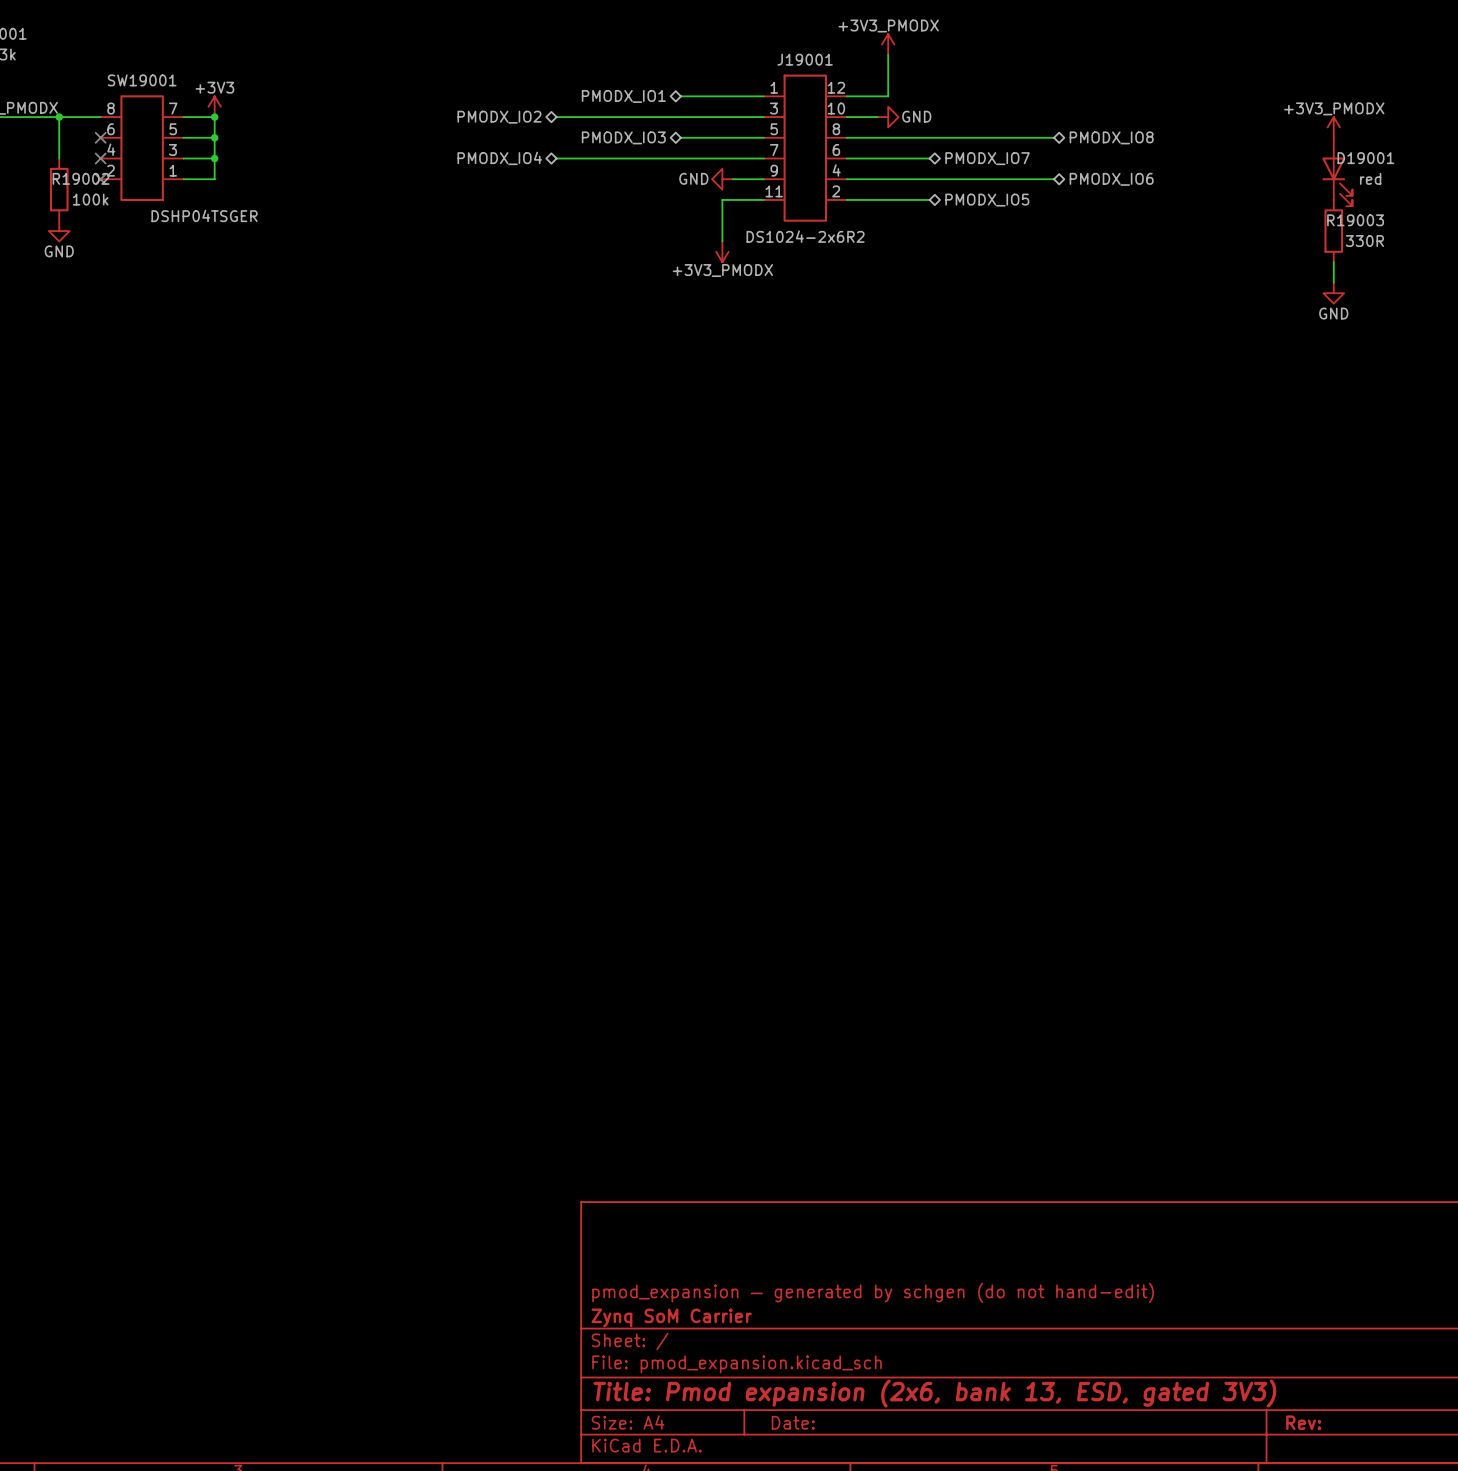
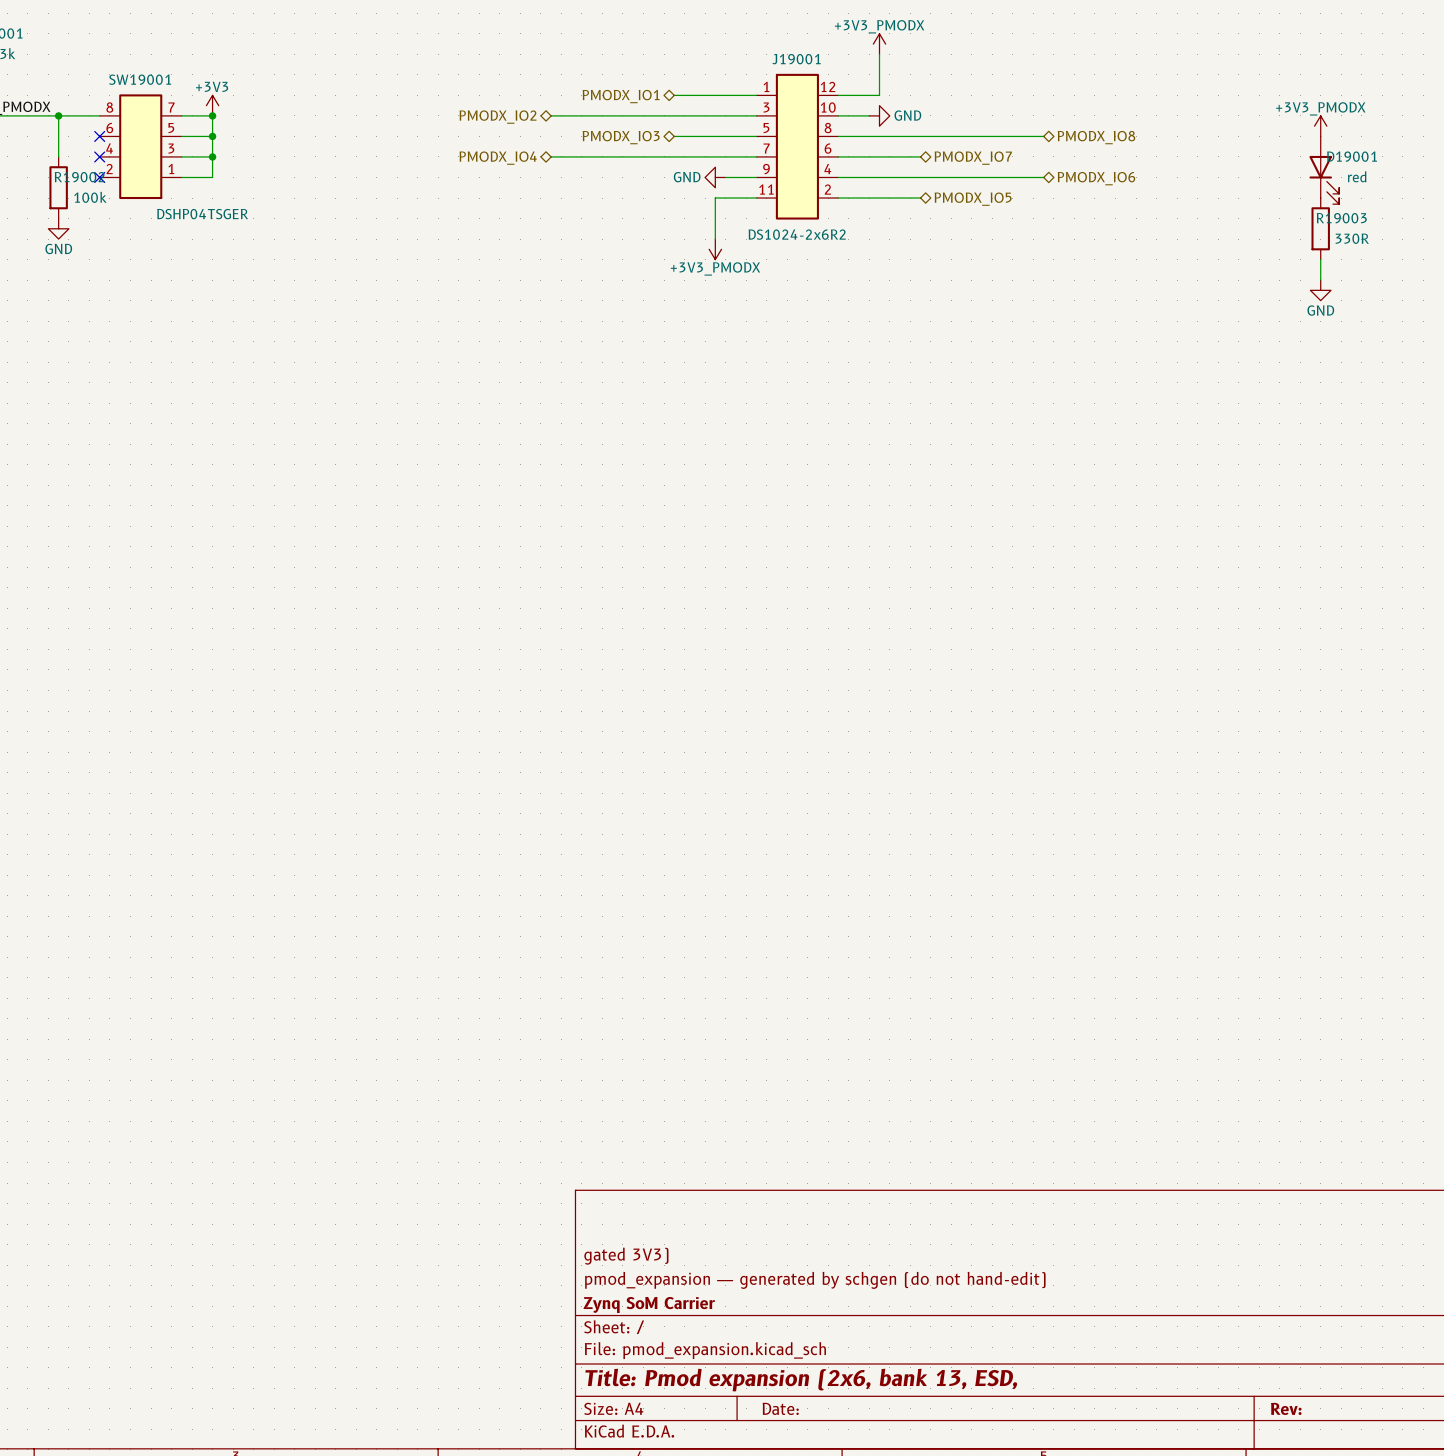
title block: none -> gated 3V3) (626, 1256)
title block: Title: Pmod expansion (2x6, bank 13, ESD, gated 3V3) (934, 1393) -> Title: Pmod expansion (2x6, bank 13, ESD, (801, 1380)

